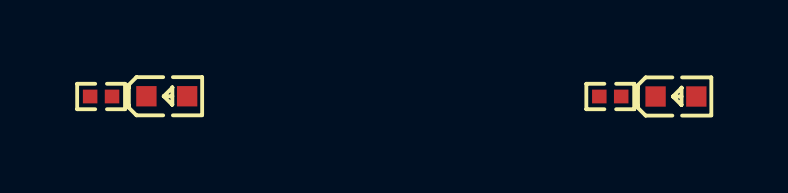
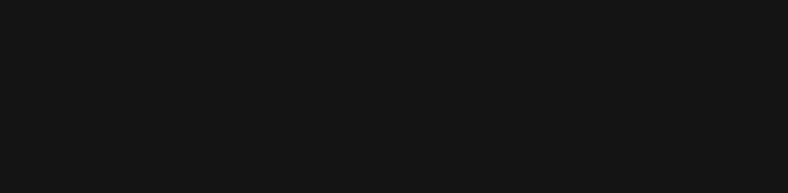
part: (101, 96) -> none
part: (165, 96) -> none
part: (610, 96) -> none
part: (674, 96) -> none

